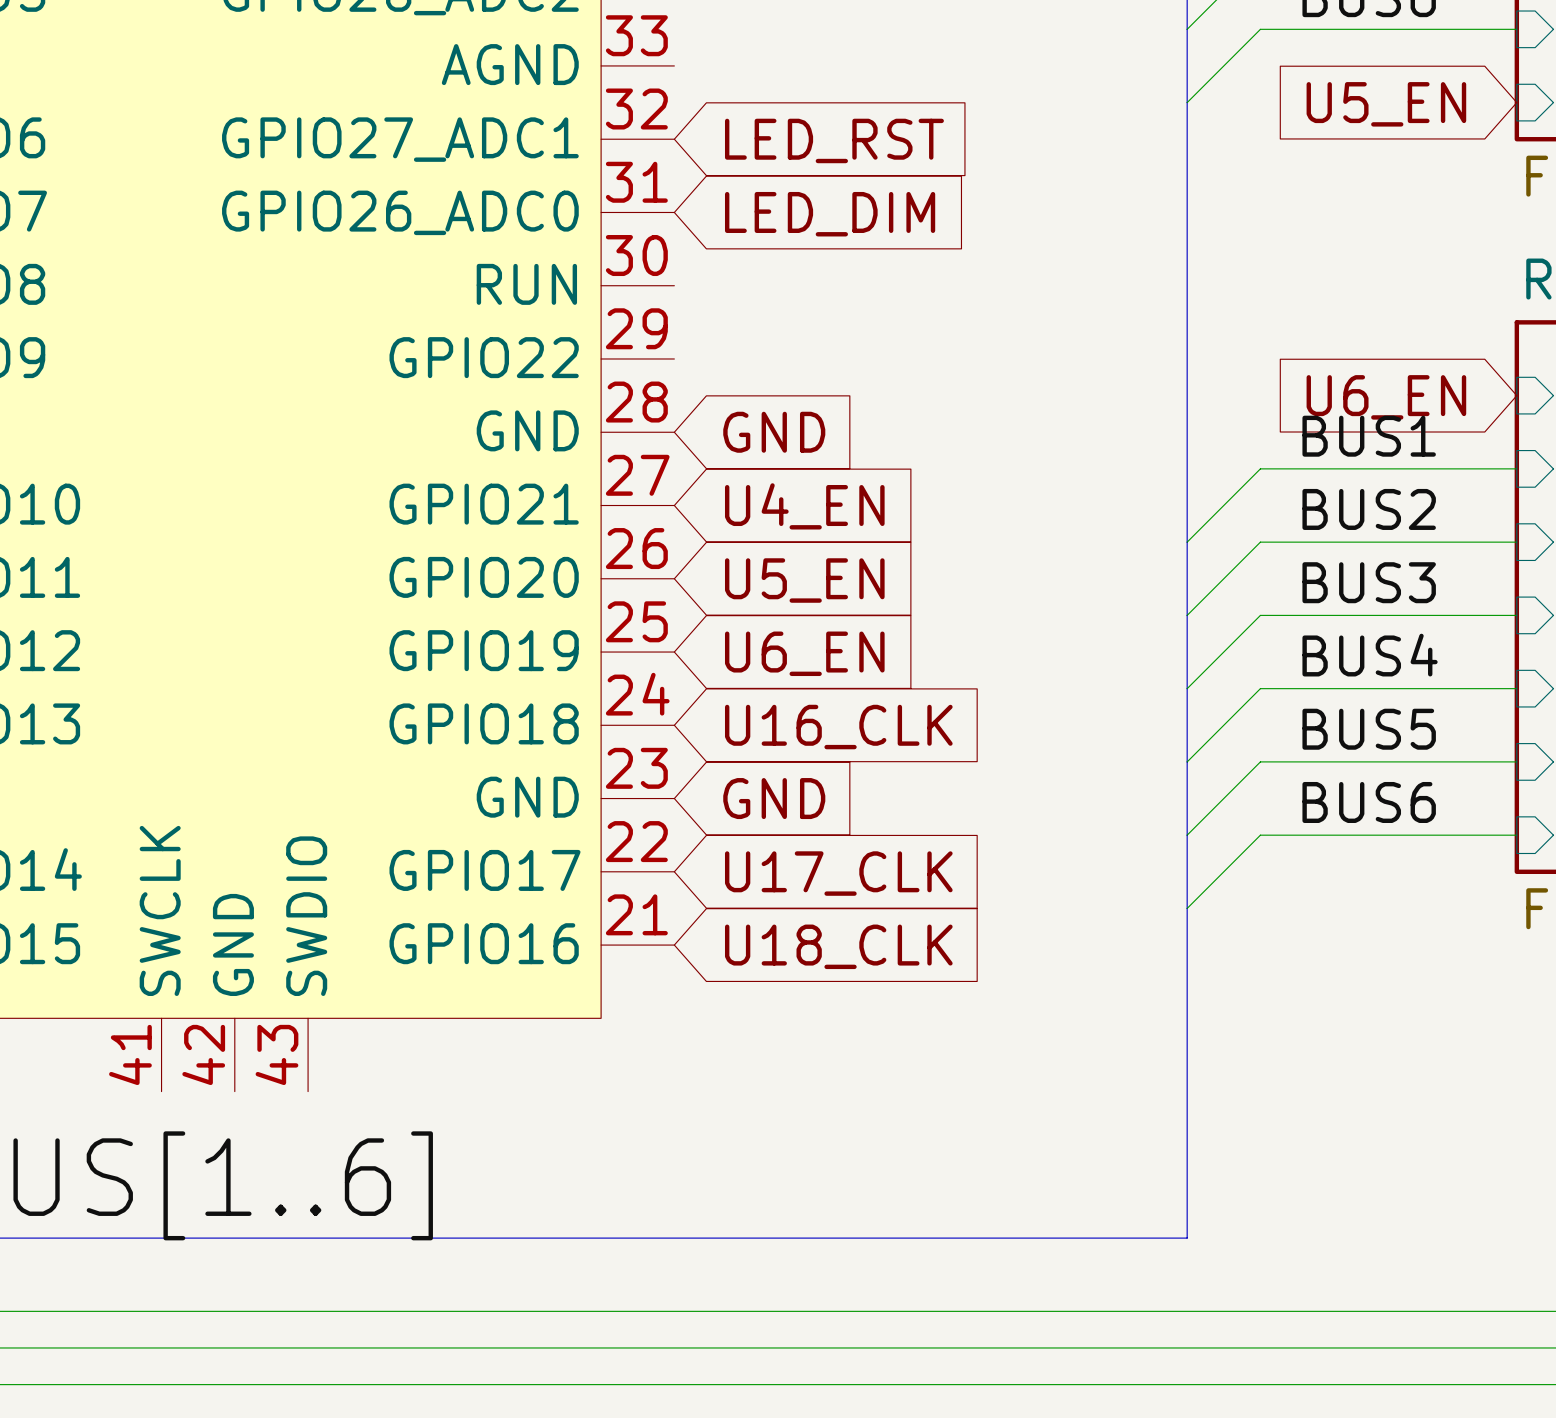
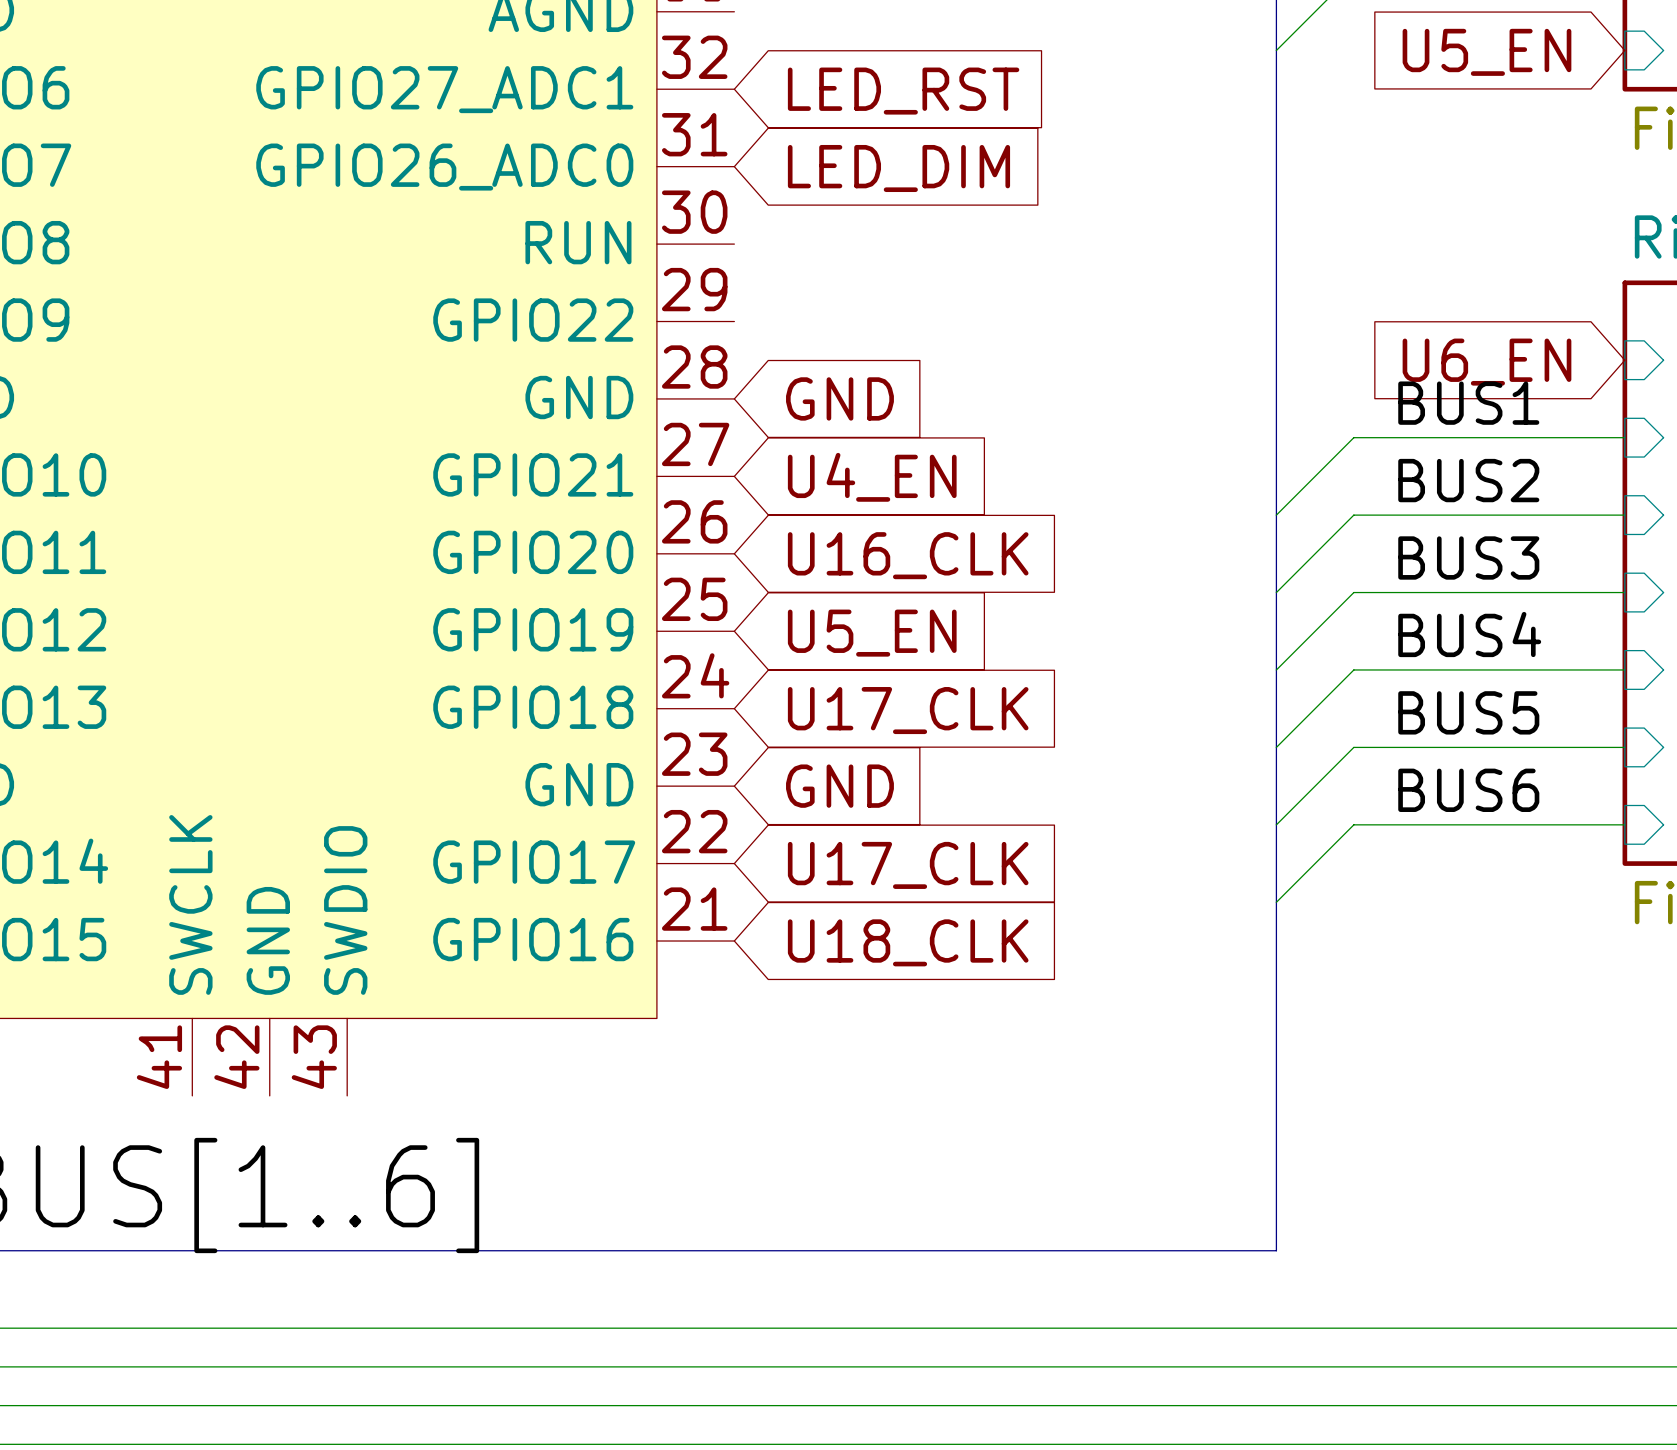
global label: U5_EN (804, 580) -> U16_CLK (908, 555)
global label: U6_EN (804, 653) -> U5_EN (872, 633)
global label: U16_CLK (838, 727) -> U17_CLK (908, 710)

